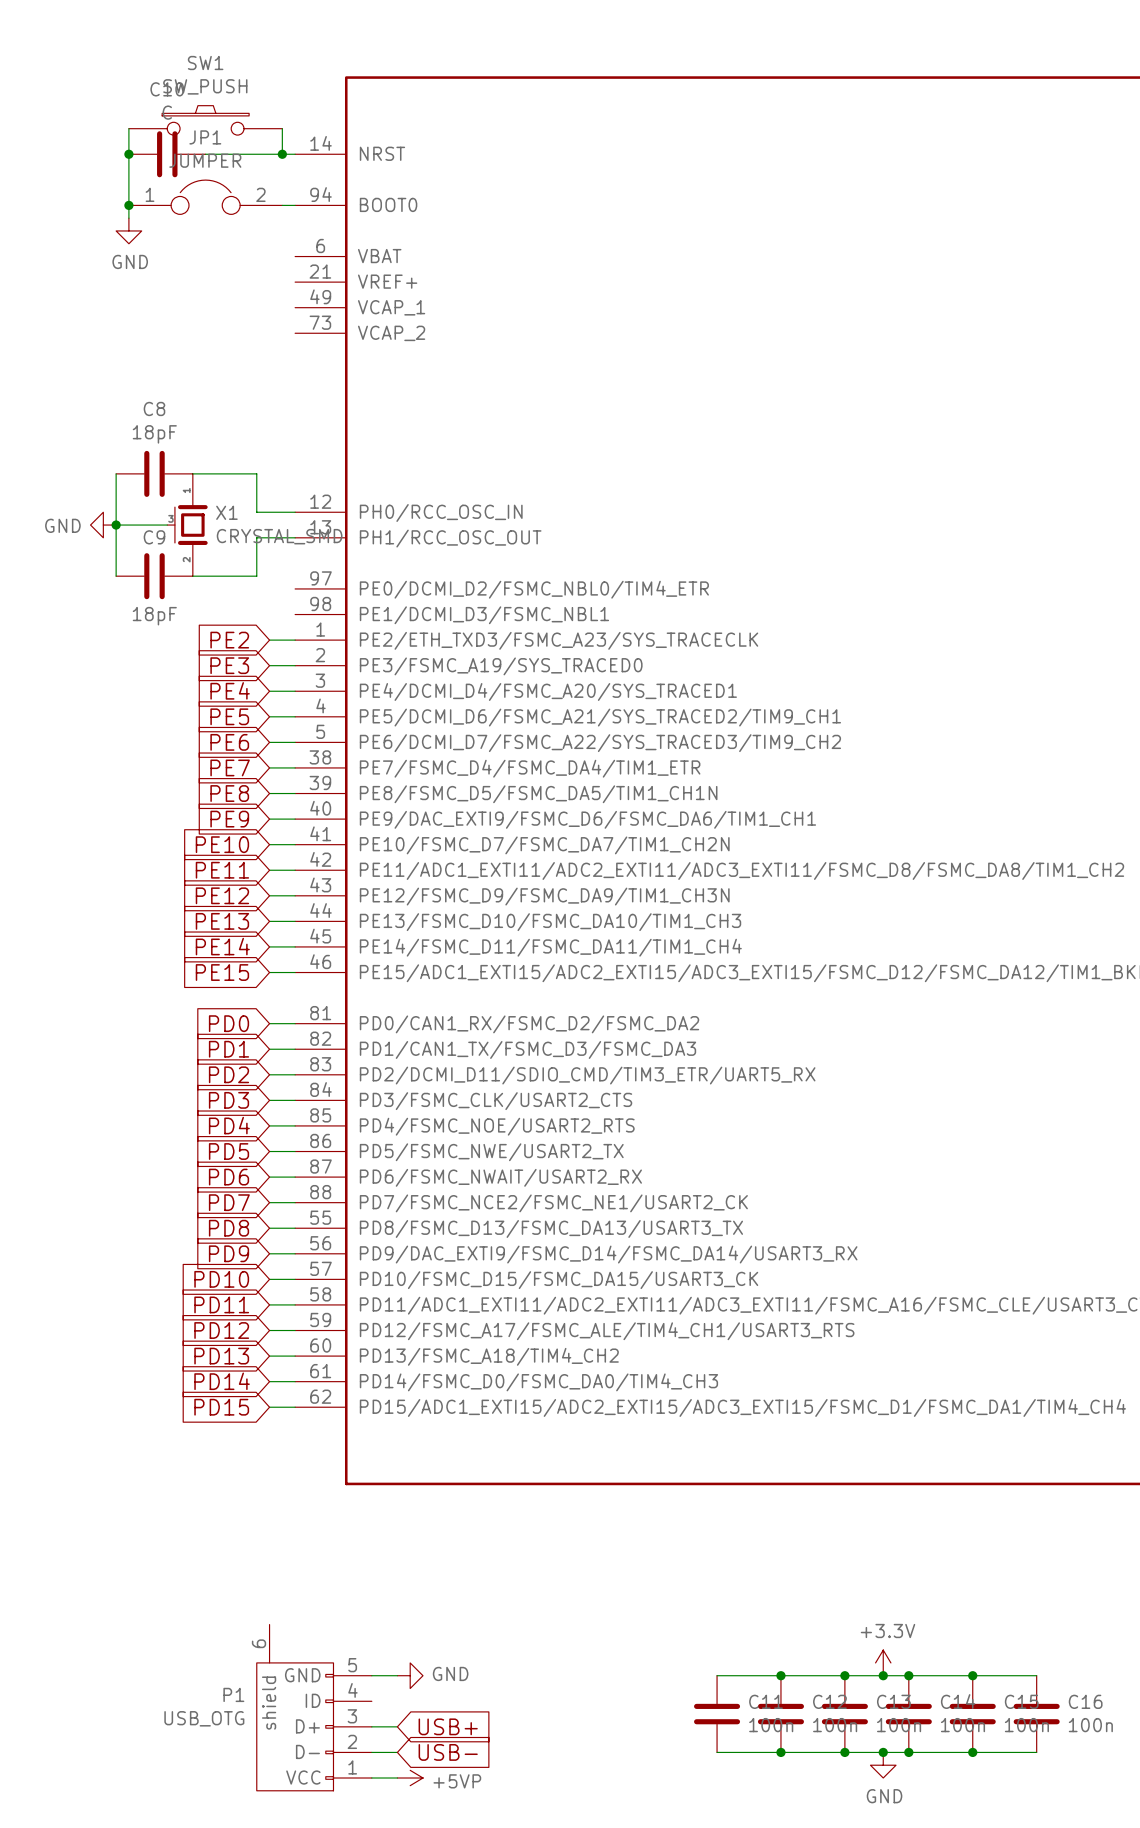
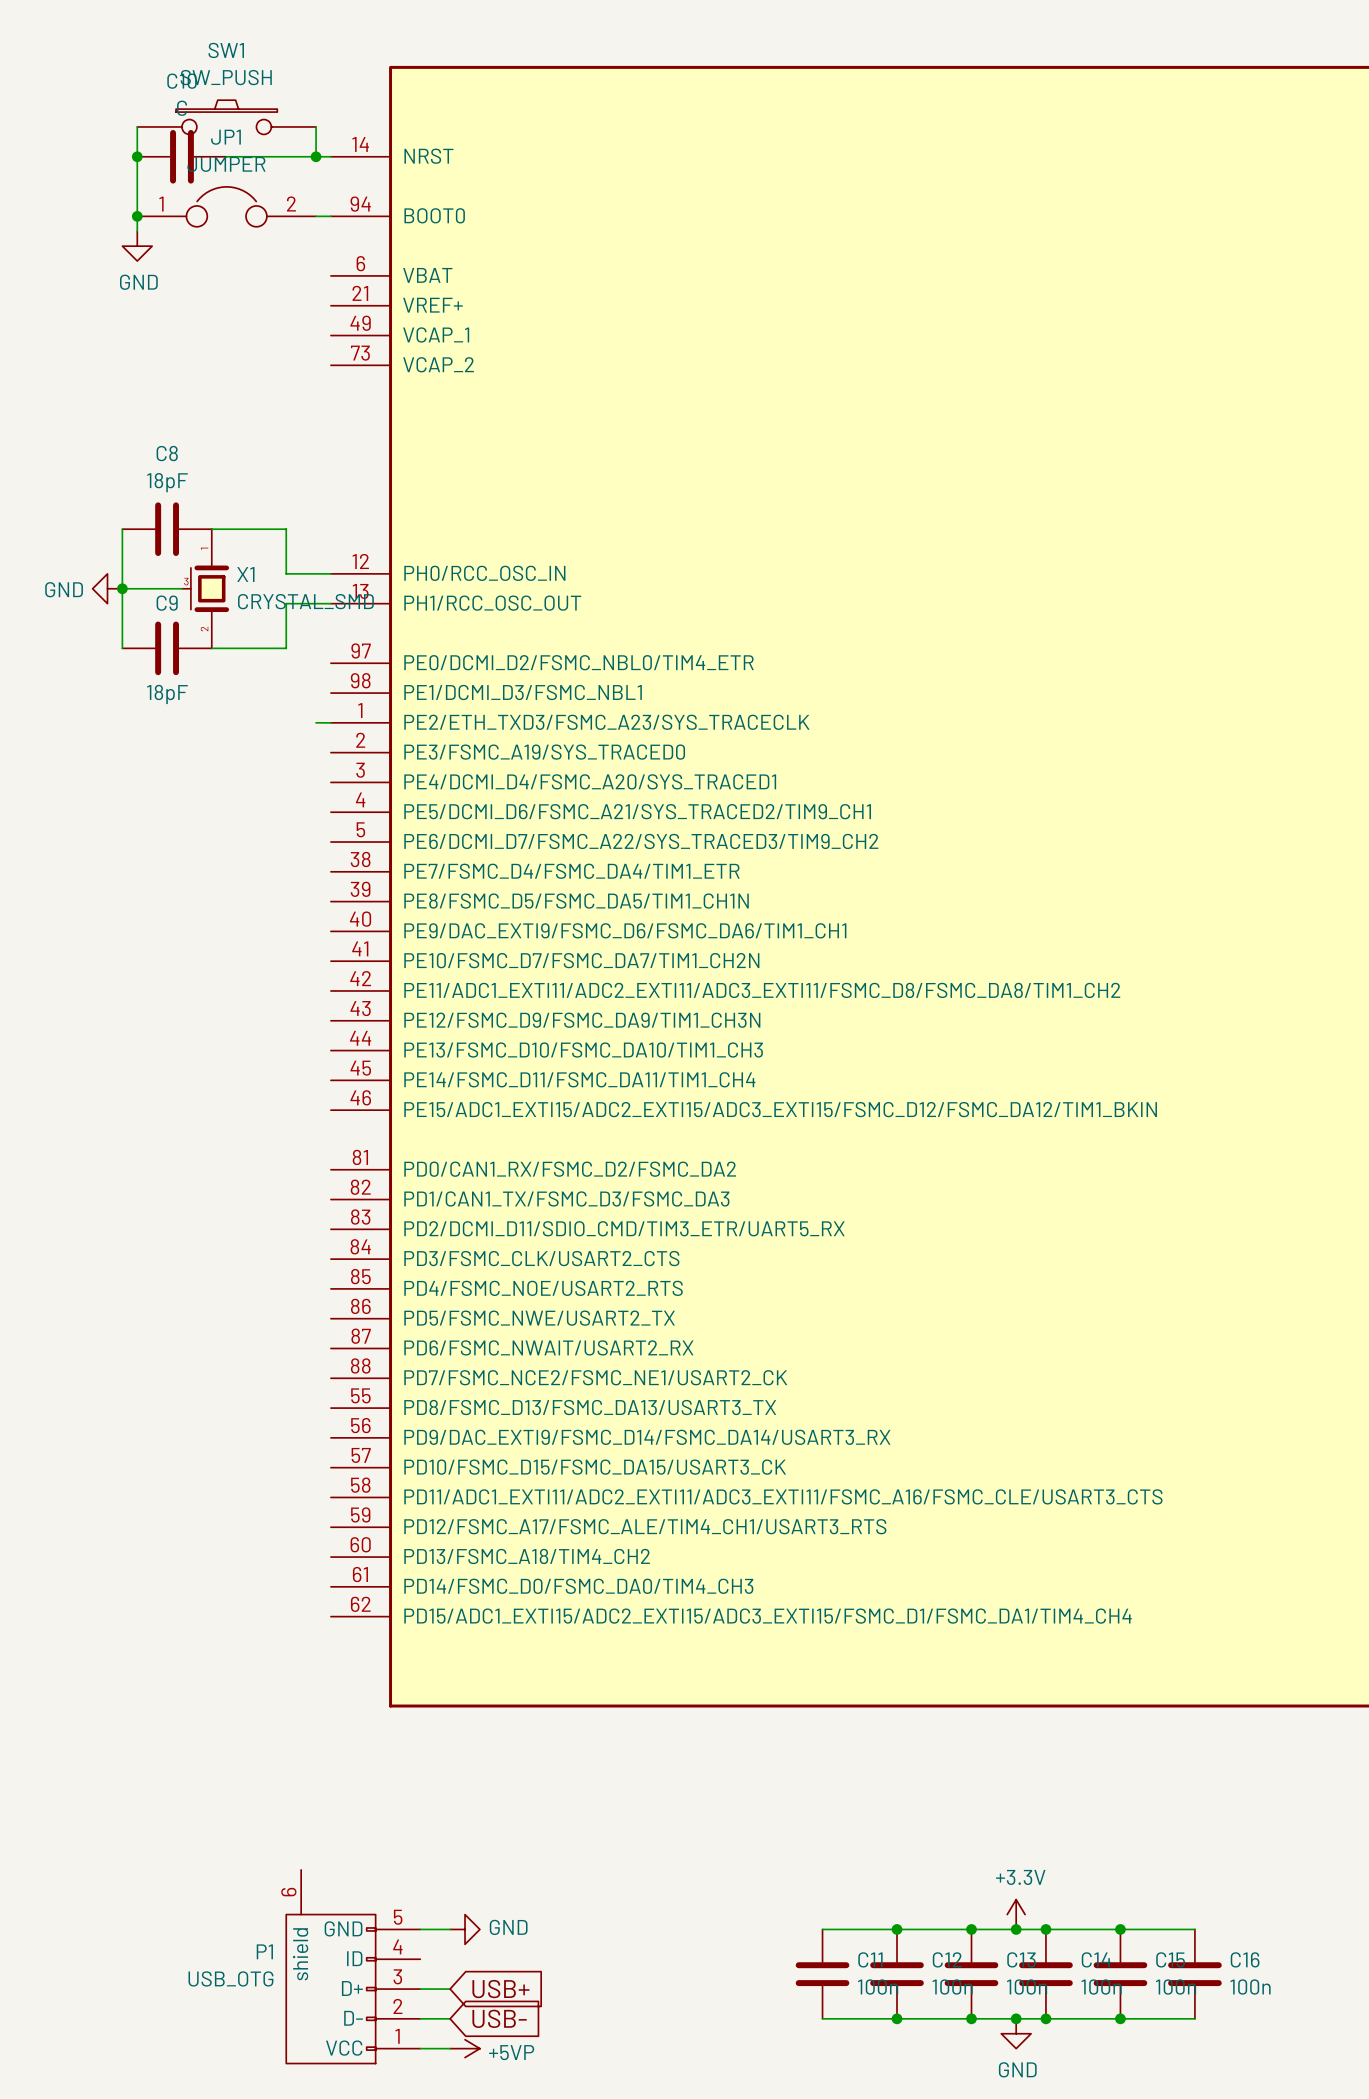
global label: PE2 (229, 640) -> none
wire: (269, 640) (282, 640) -> none
global label: PE3 (229, 665) -> none
wire: (269, 665) (295, 665) -> none
global label: PE4 (230, 690) -> none
wire: (269, 691) (295, 691) -> none
global label: PE5 (229, 716) -> none
wire: (269, 716) (295, 716) -> none
global label: PE6 (229, 742) -> none
wire: (269, 742) (295, 742) -> none
global label: PE7 (230, 767) -> none
wire: (269, 767) (295, 767) -> none
global label: PE8 (229, 793) -> none
wire: (269, 793) (295, 793) -> none
global label: PE9 (229, 819) -> none
wire: (269, 819) (295, 819) -> none
global label: PE10 (222, 844) -> none
wire: (269, 844) (295, 844) -> none
global label: PE11 (222, 870) -> none
wire: (269, 870) (295, 870) -> none
global label: PE12 (222, 895) -> none
wire: (269, 895) (295, 895) -> none
global label: PE13 (222, 921) -> none
wire: (269, 921) (295, 921) -> none
global label: PE14 (222, 946) -> none
wire: (269, 946) (295, 946) -> none
global label: PE15 (222, 972) -> none
wire: (269, 972) (295, 972) -> none
global label: PD0 (229, 1023) -> none
wire: (269, 1023) (295, 1023) -> none
global label: PD1 (229, 1049) -> none
wire: (269, 1049) (295, 1049) -> none
global label: PD2 (229, 1074) -> none
wire: (269, 1074) (295, 1074) -> none
global label: PD3 (229, 1100) -> none
wire: (269, 1100) (295, 1100) -> none
global label: PD4 (229, 1125) -> none
wire: (269, 1125) (295, 1125) -> none
global label: PD5 (229, 1151) -> none
wire: (269, 1151) (295, 1151) -> none
global label: PD6 (229, 1177) -> none
wire: (269, 1177) (295, 1177) -> none
global label: PD7 (229, 1202) -> none
wire: (269, 1202) (295, 1202) -> none
global label: PD8 (229, 1228) -> none
wire: (269, 1228) (295, 1228) -> none
global label: PD9 (229, 1253) -> none
wire: (269, 1253) (295, 1253) -> none
global label: PD10 (221, 1279) -> none
wire: (269, 1279) (295, 1279) -> none
global label: PD11 (221, 1304) -> none
wire: (269, 1304) (295, 1304) -> none
global label: PD12 (221, 1330) -> none
wire: (269, 1330) (295, 1330) -> none
global label: PD13 (221, 1356) -> none
wire: (269, 1356) (295, 1356) -> none
global label: PD14 (222, 1381) -> none
wire: (269, 1381) (295, 1381) -> none
global label: PD15 (221, 1407) -> none
wire: (269, 1407) (295, 1407) -> none

